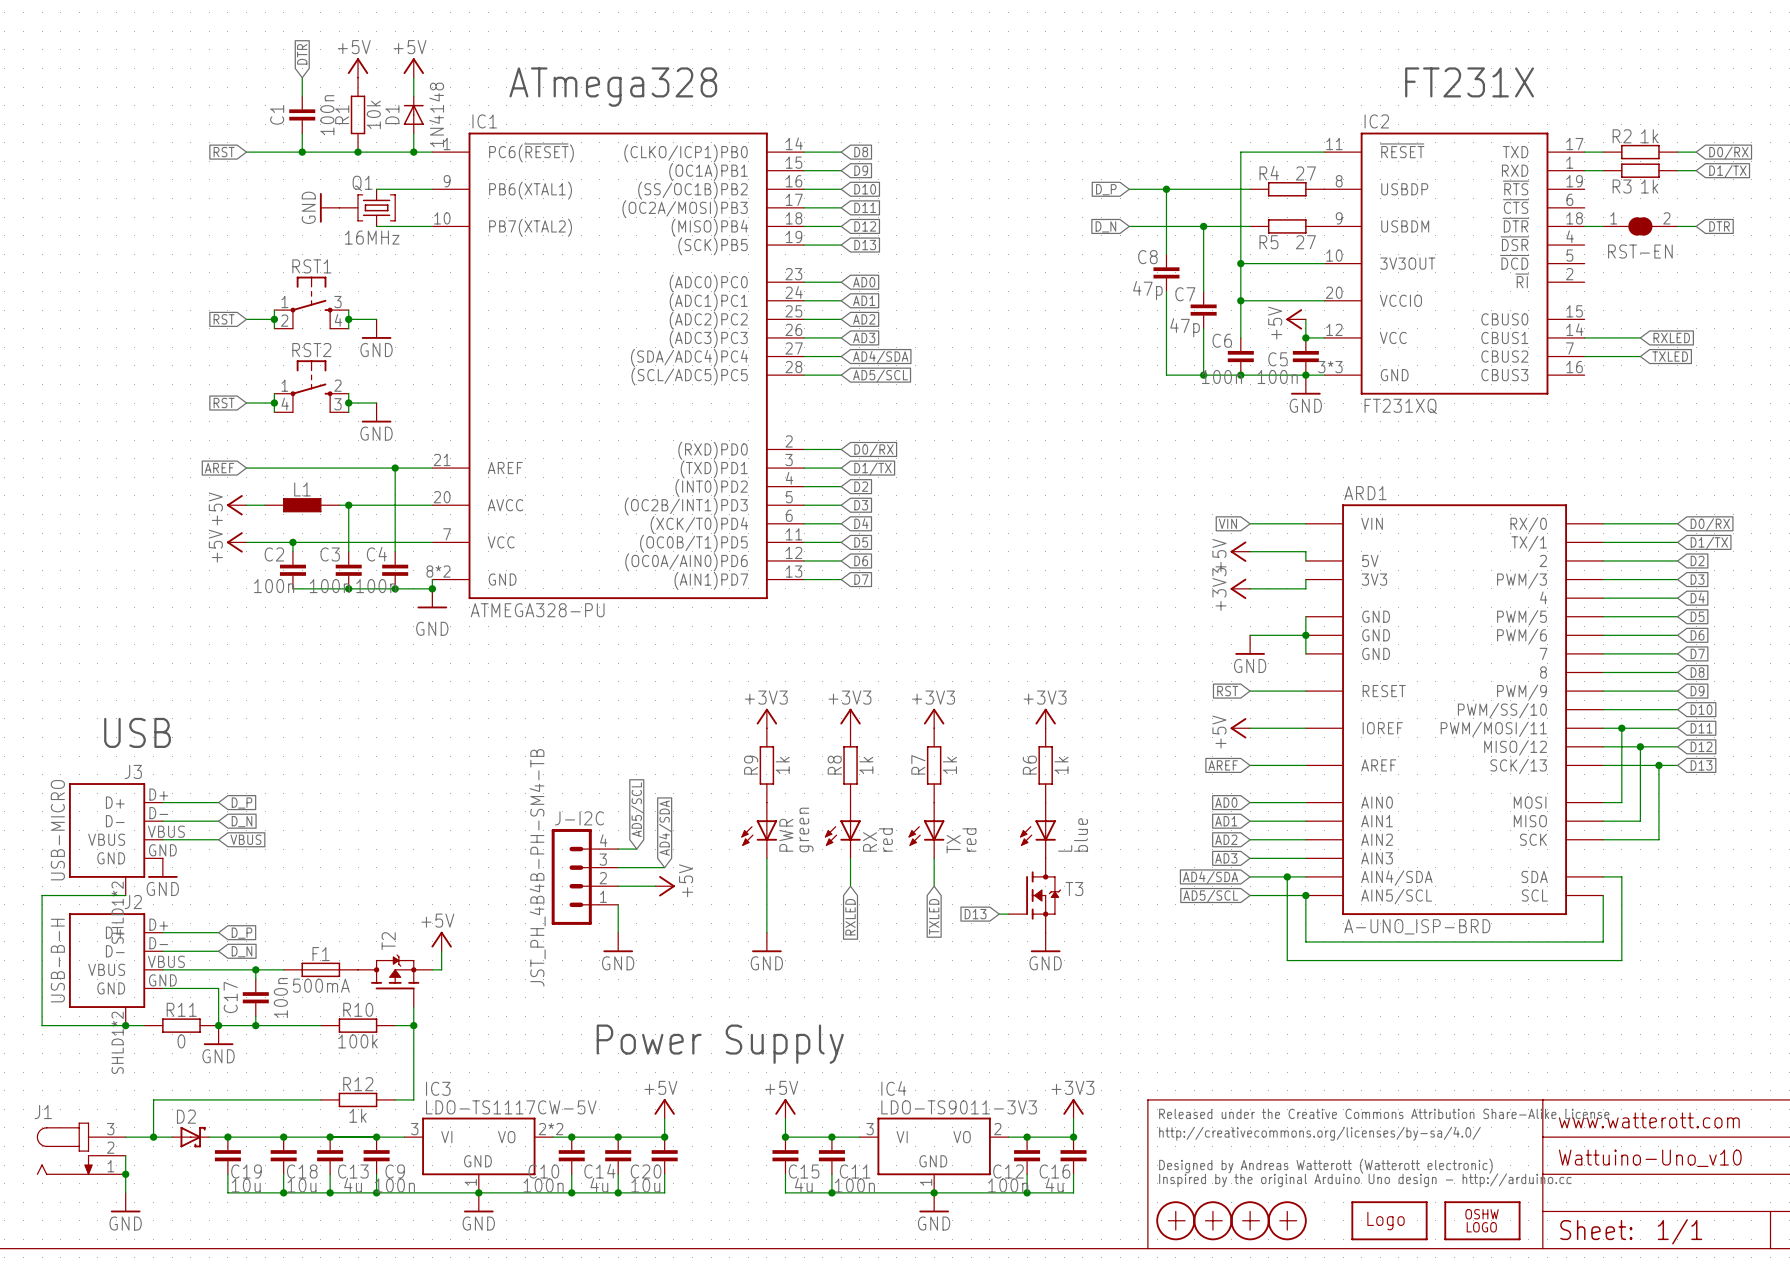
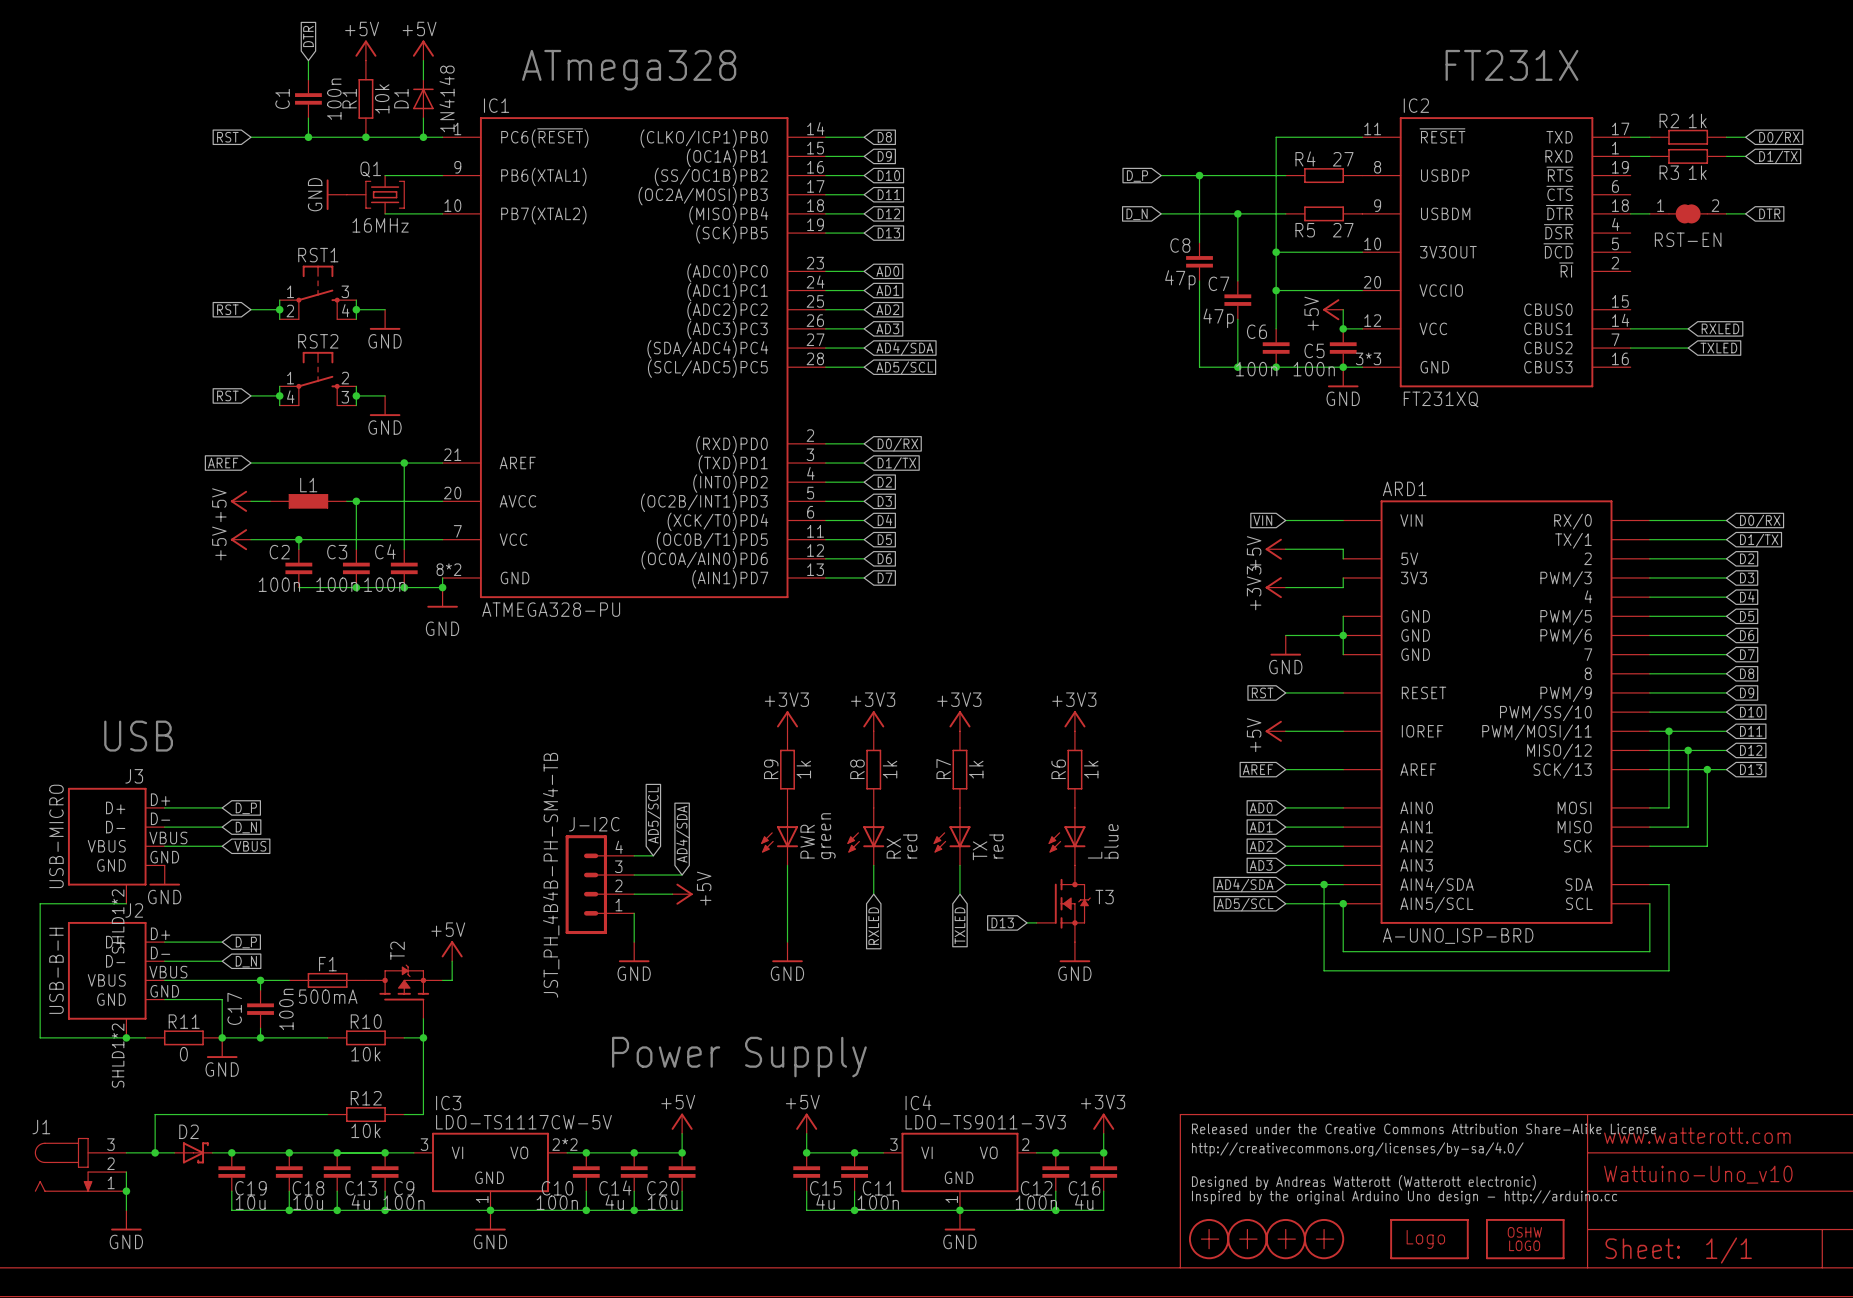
R10 value: 100k (358, 1041) -> 10k (365, 1054)
R12 value: 1k (358, 1115) -> 10k (365, 1130)

